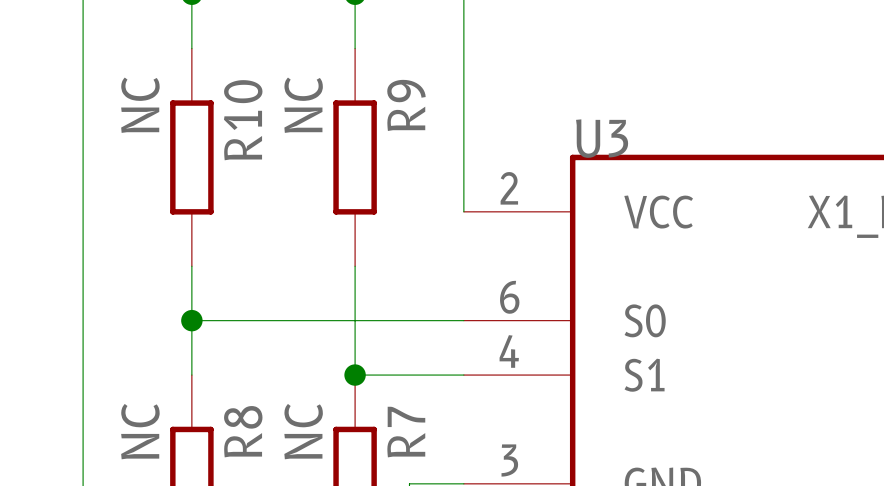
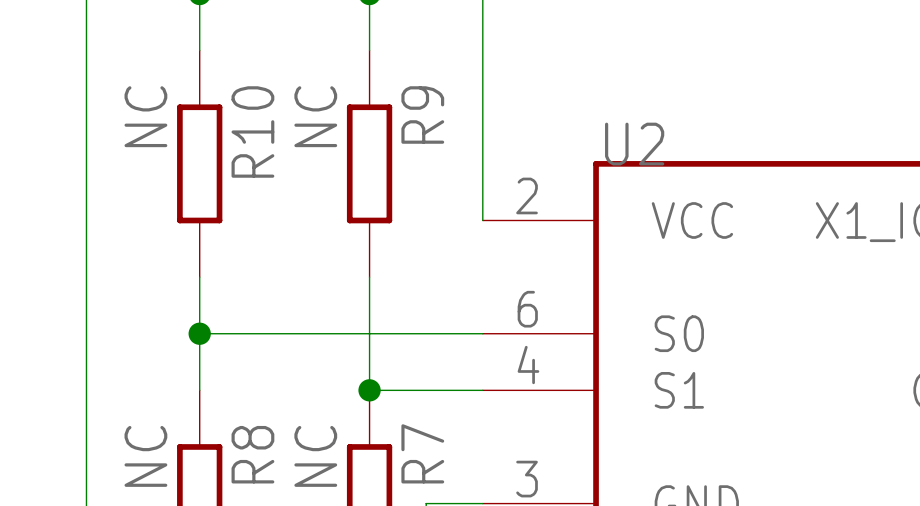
U3 name: U3 (602, 138) -> U2 (634, 144)

